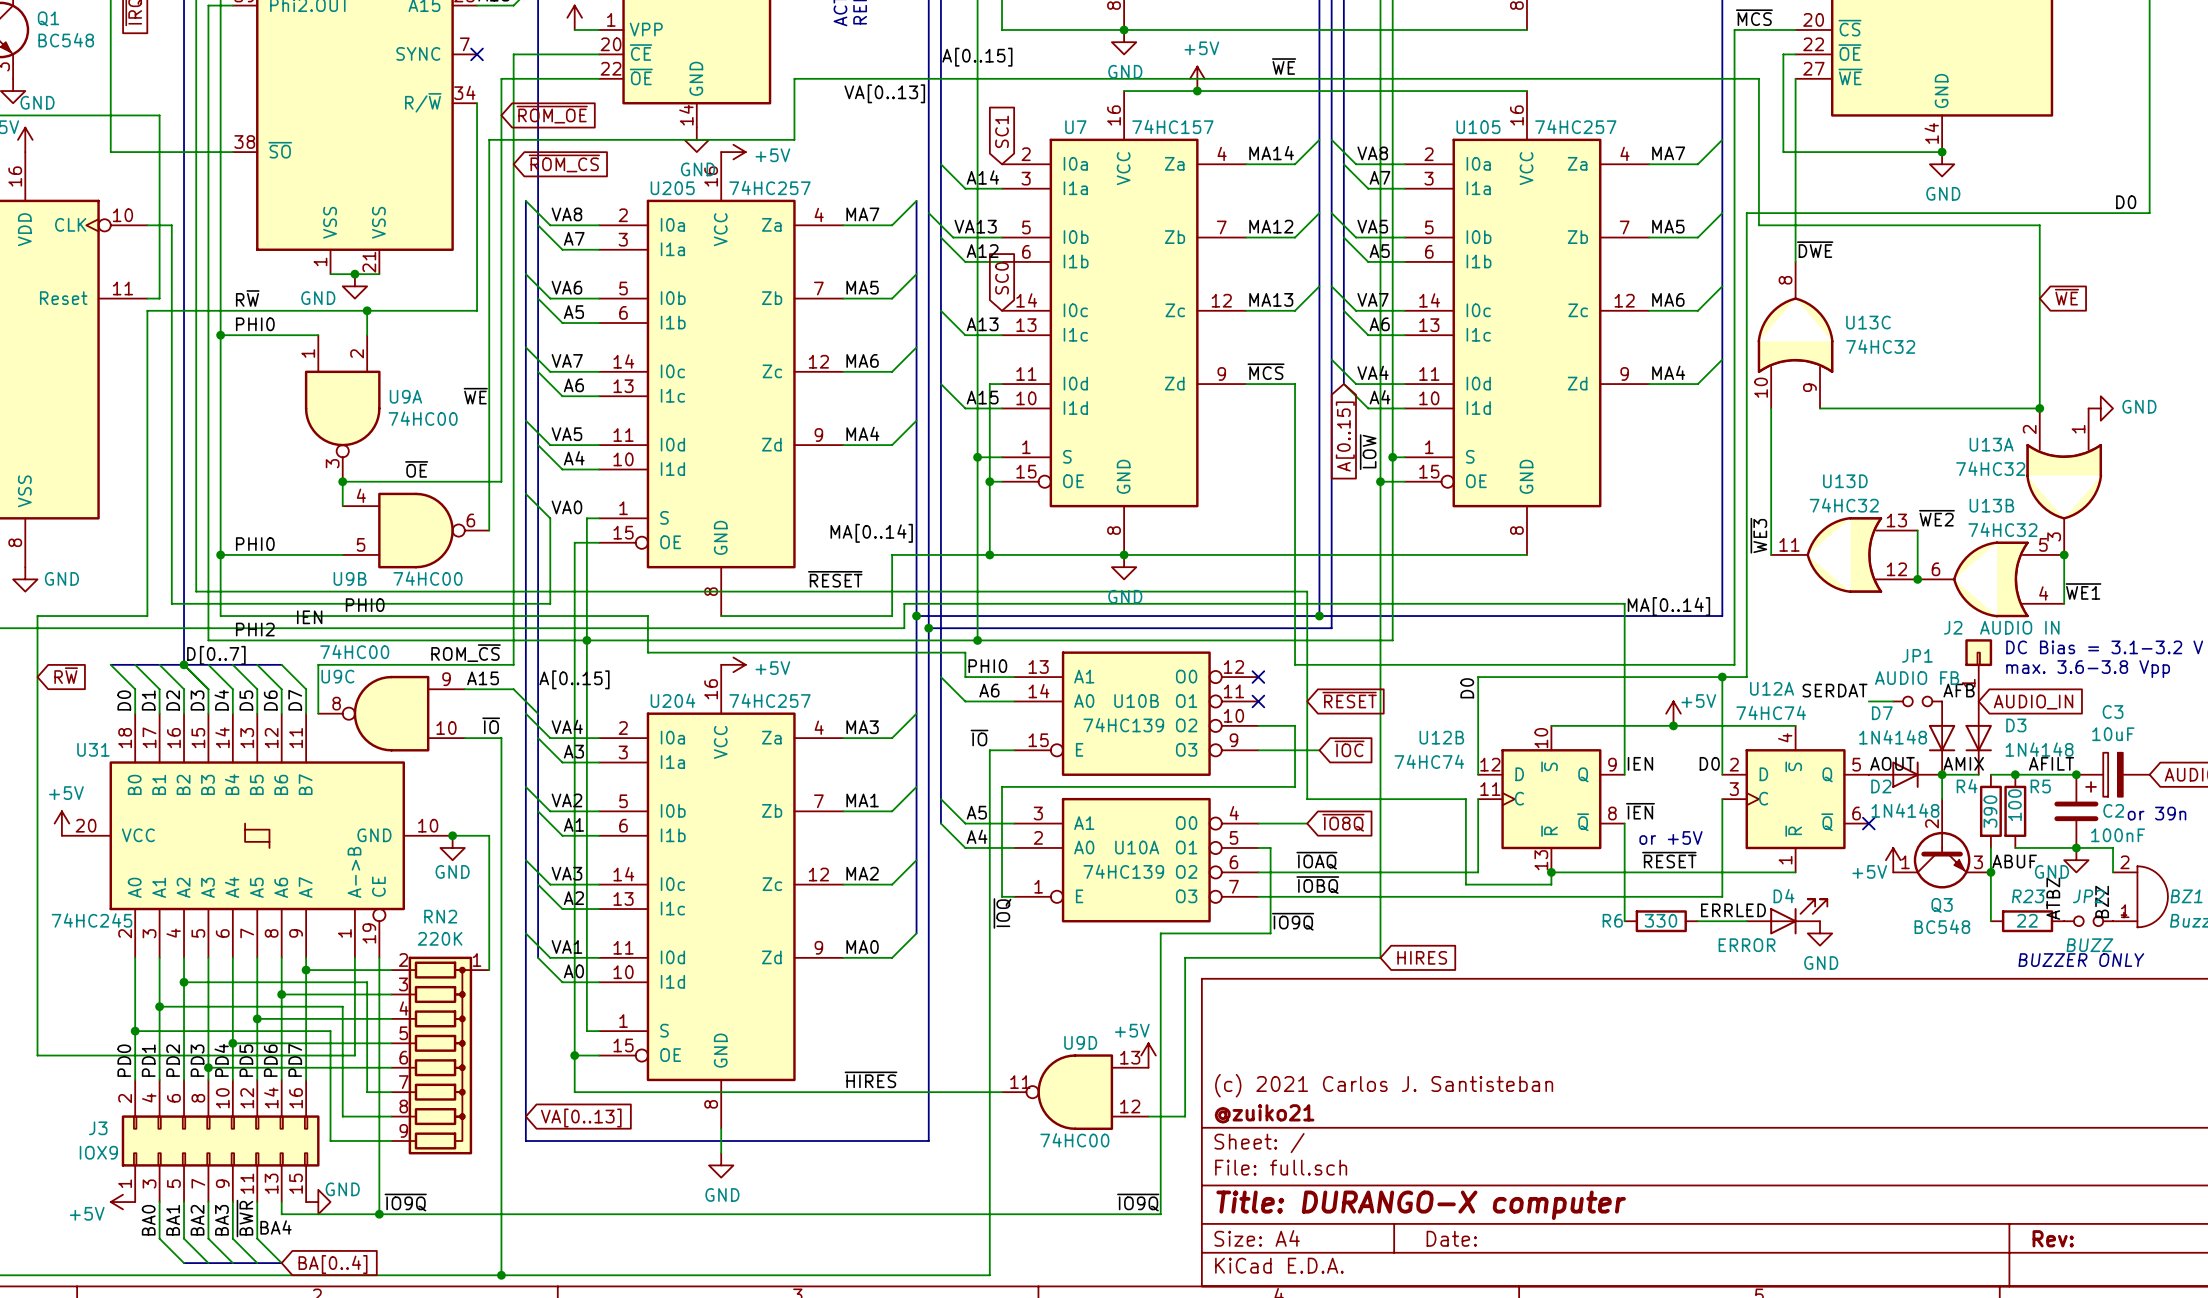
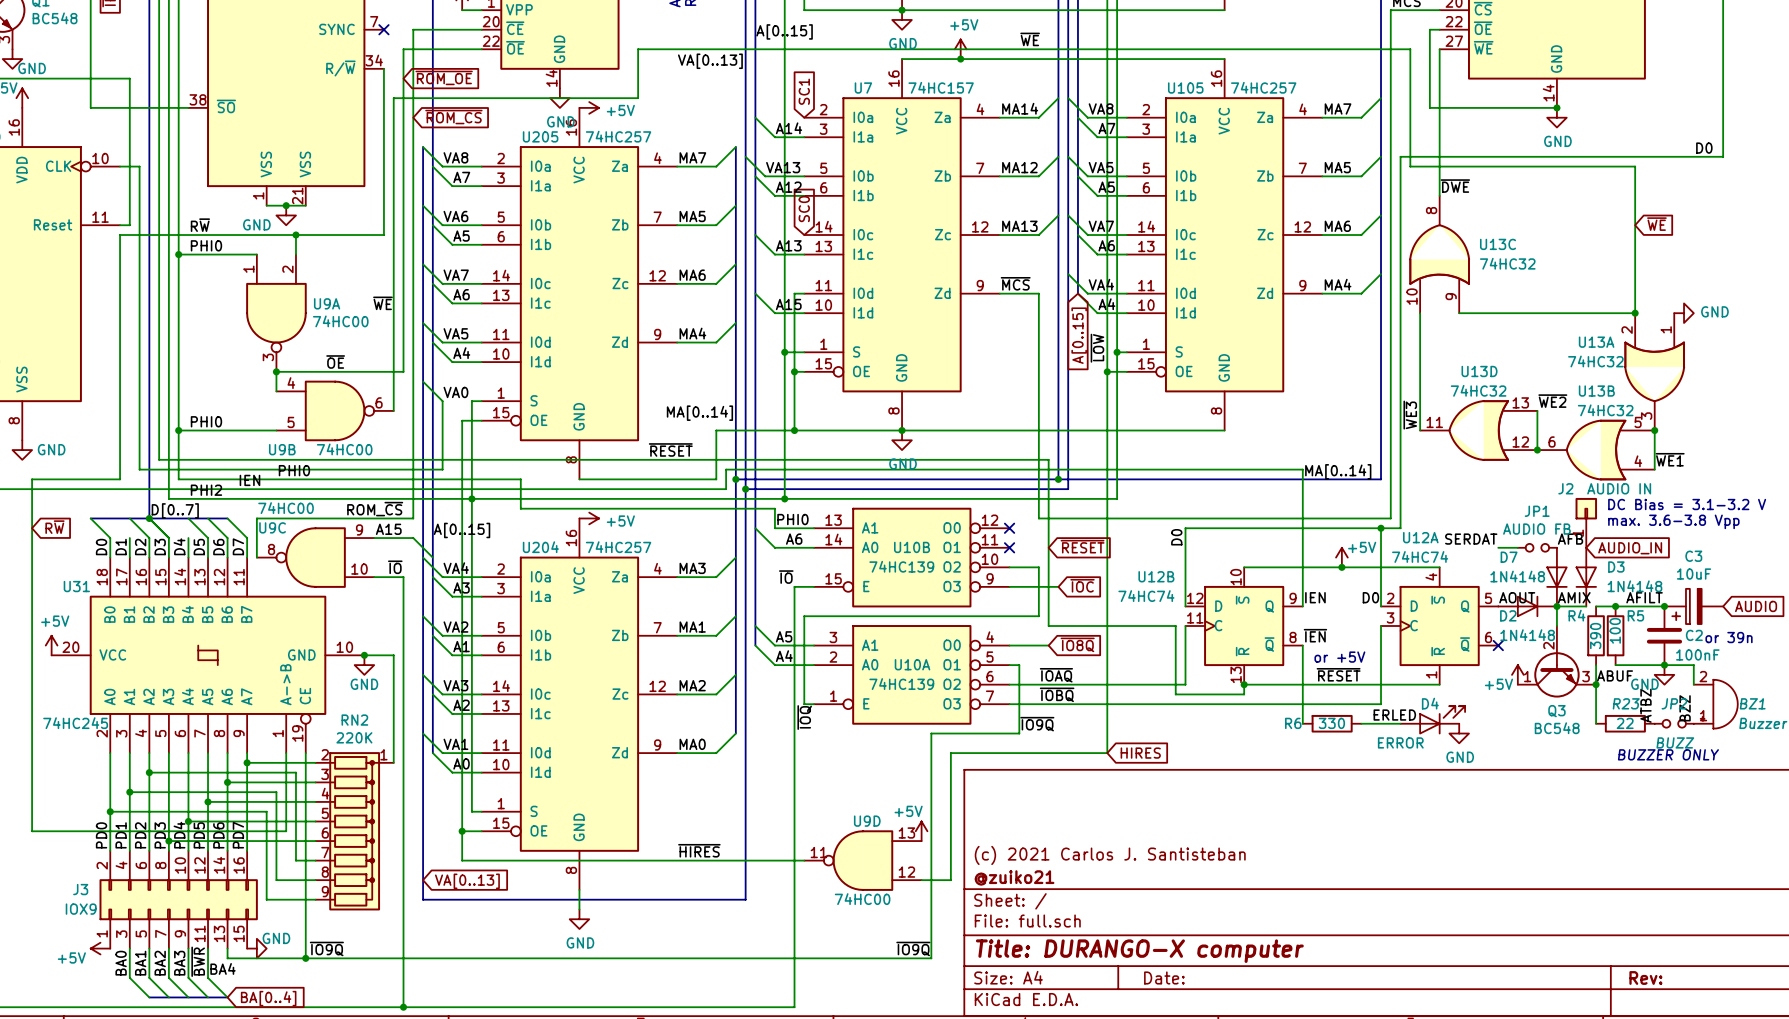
wire: (135, 664) (159, 689) -> none
wire: (208, 664) (232, 689) -> none
label: ERRLED (1733, 910) -> ERLED (1394, 715)

